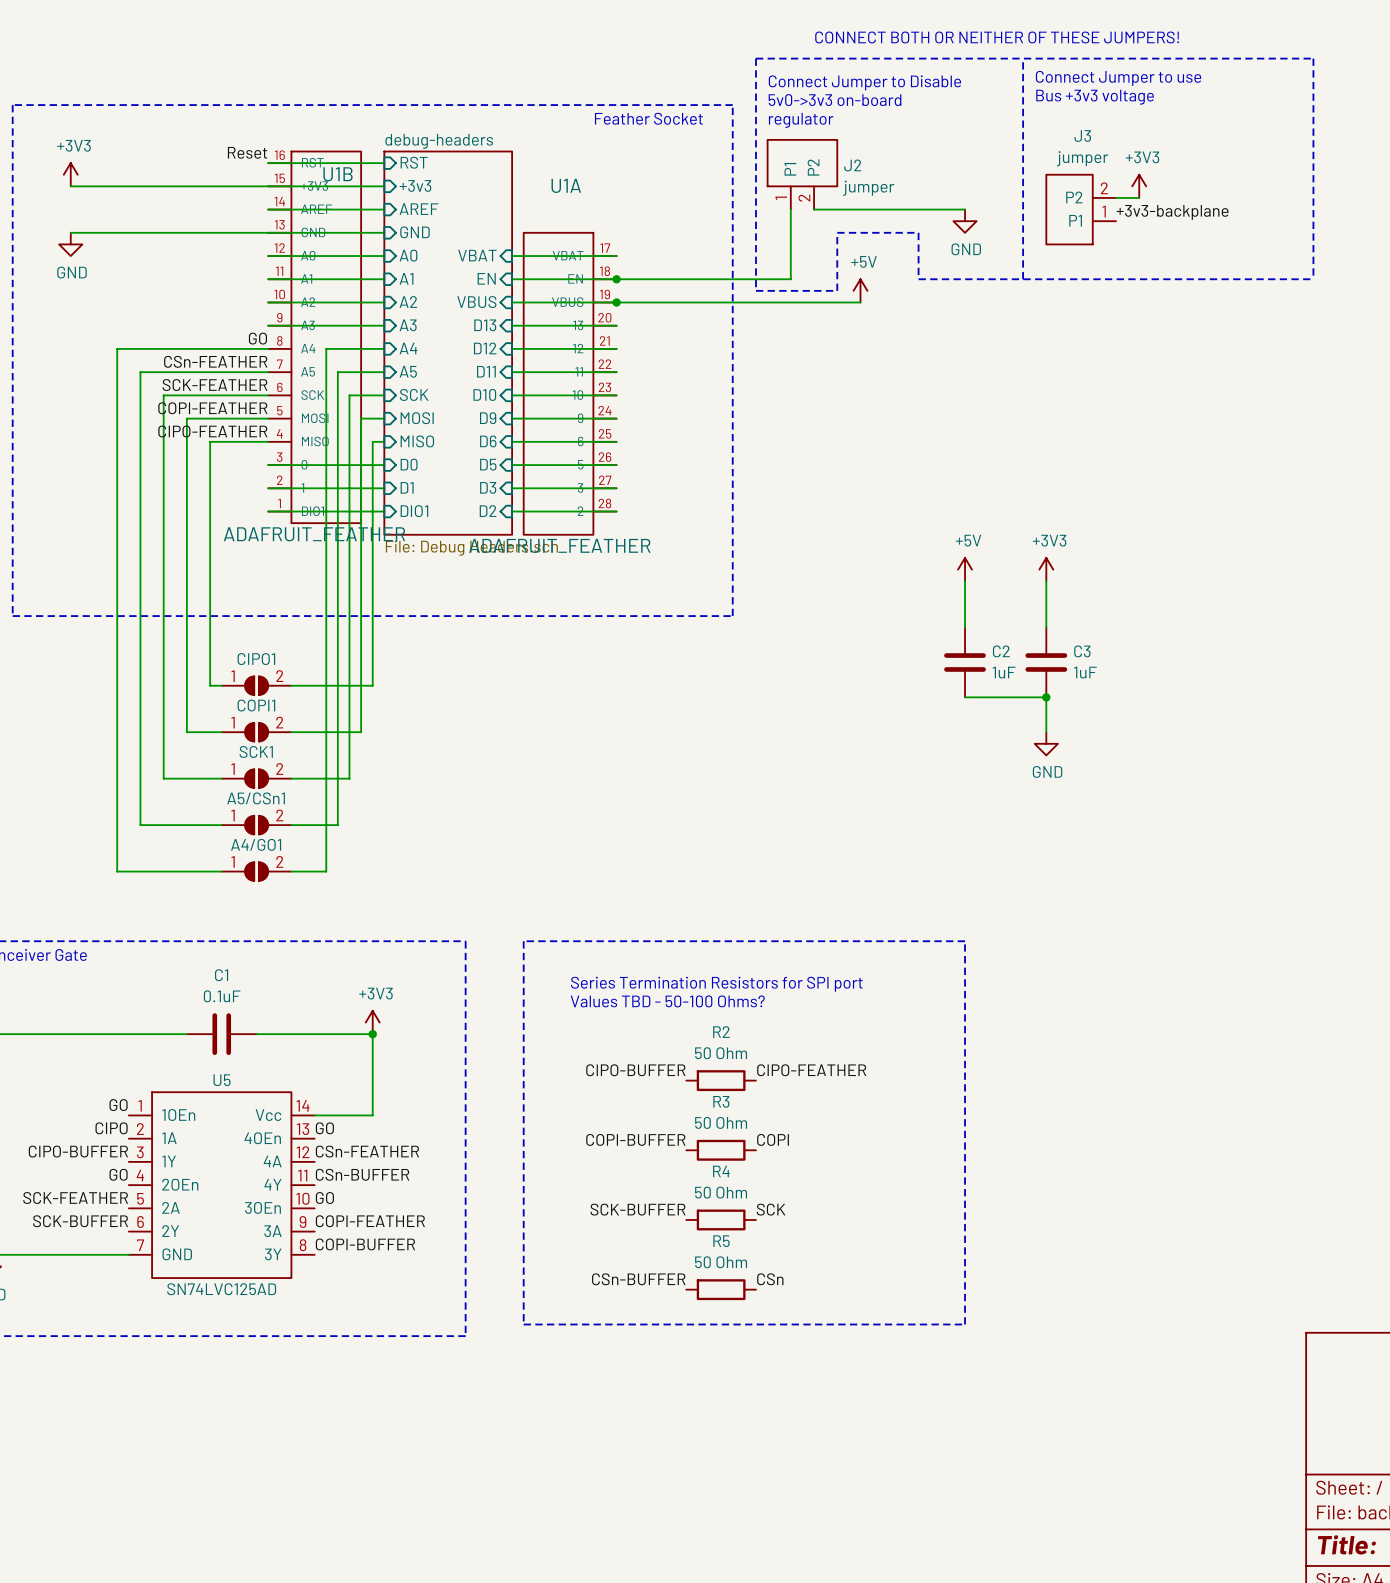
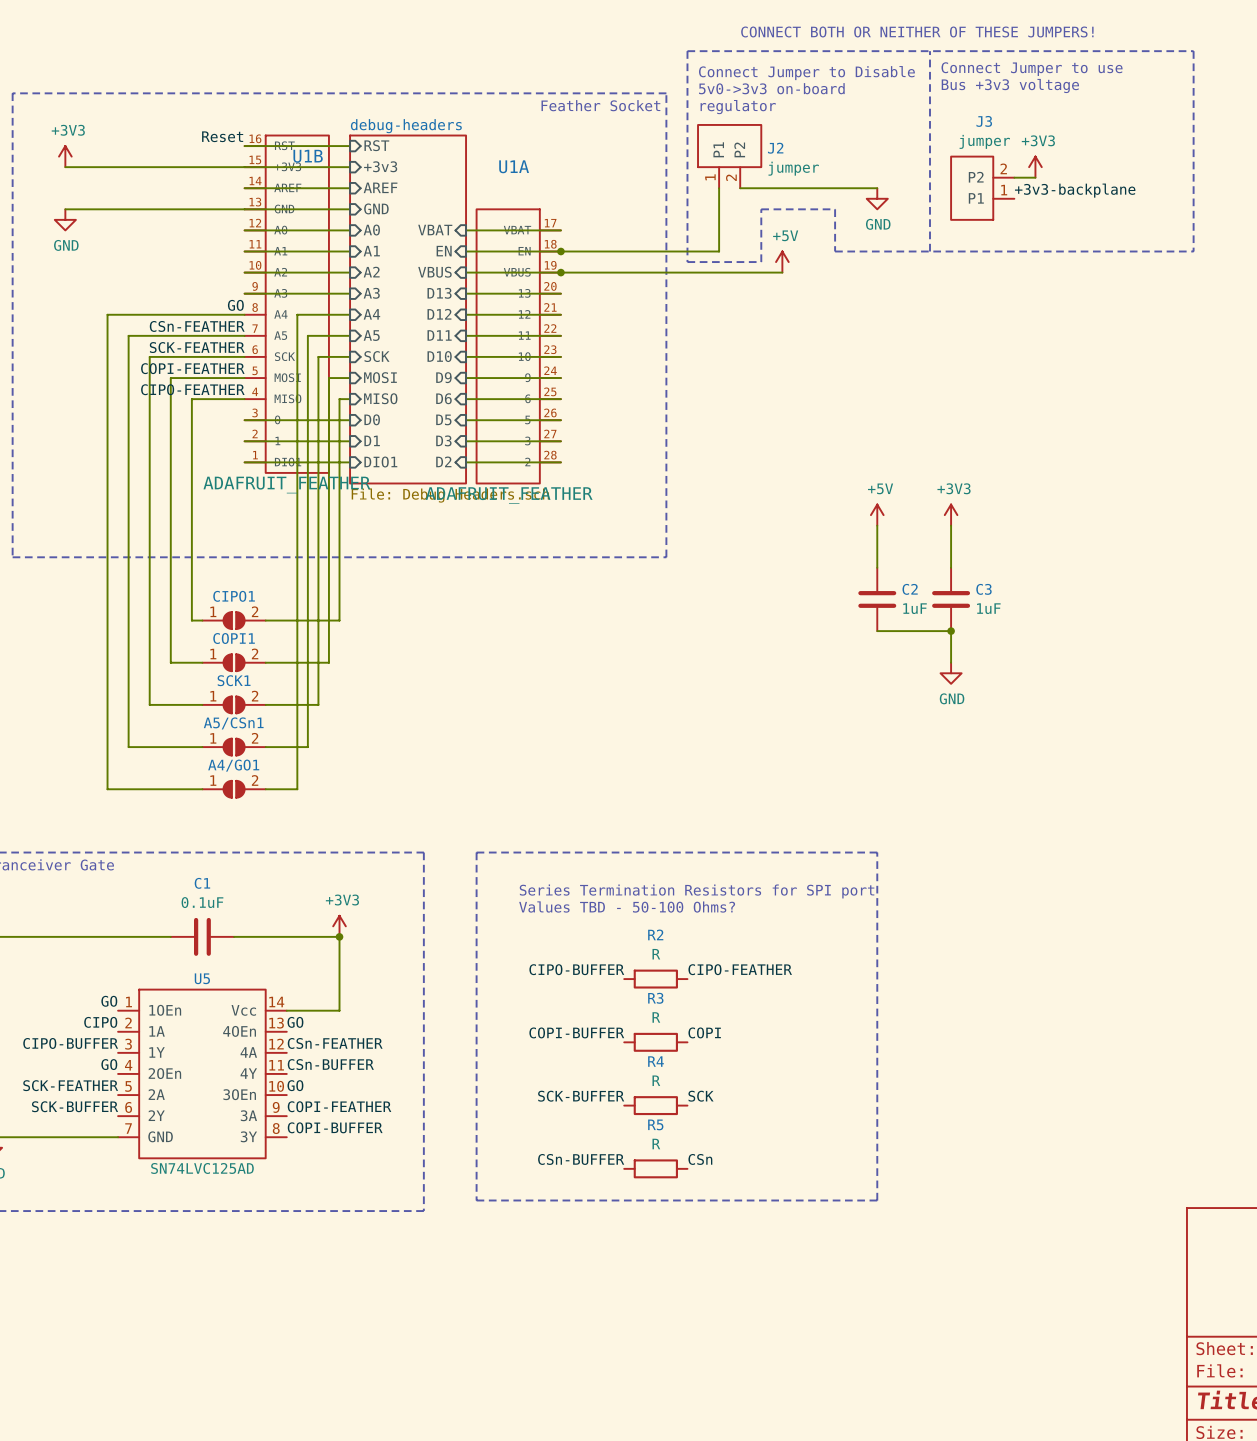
R2 value: 50 Ohm (721, 1053) -> R (656, 954)
R3 value: 50 Ohm (721, 1122) -> R (656, 1017)
R4 value: 50 Ohm (721, 1192) -> R (656, 1080)
R5 value: 50 Ohm (721, 1262) -> R (656, 1144)

